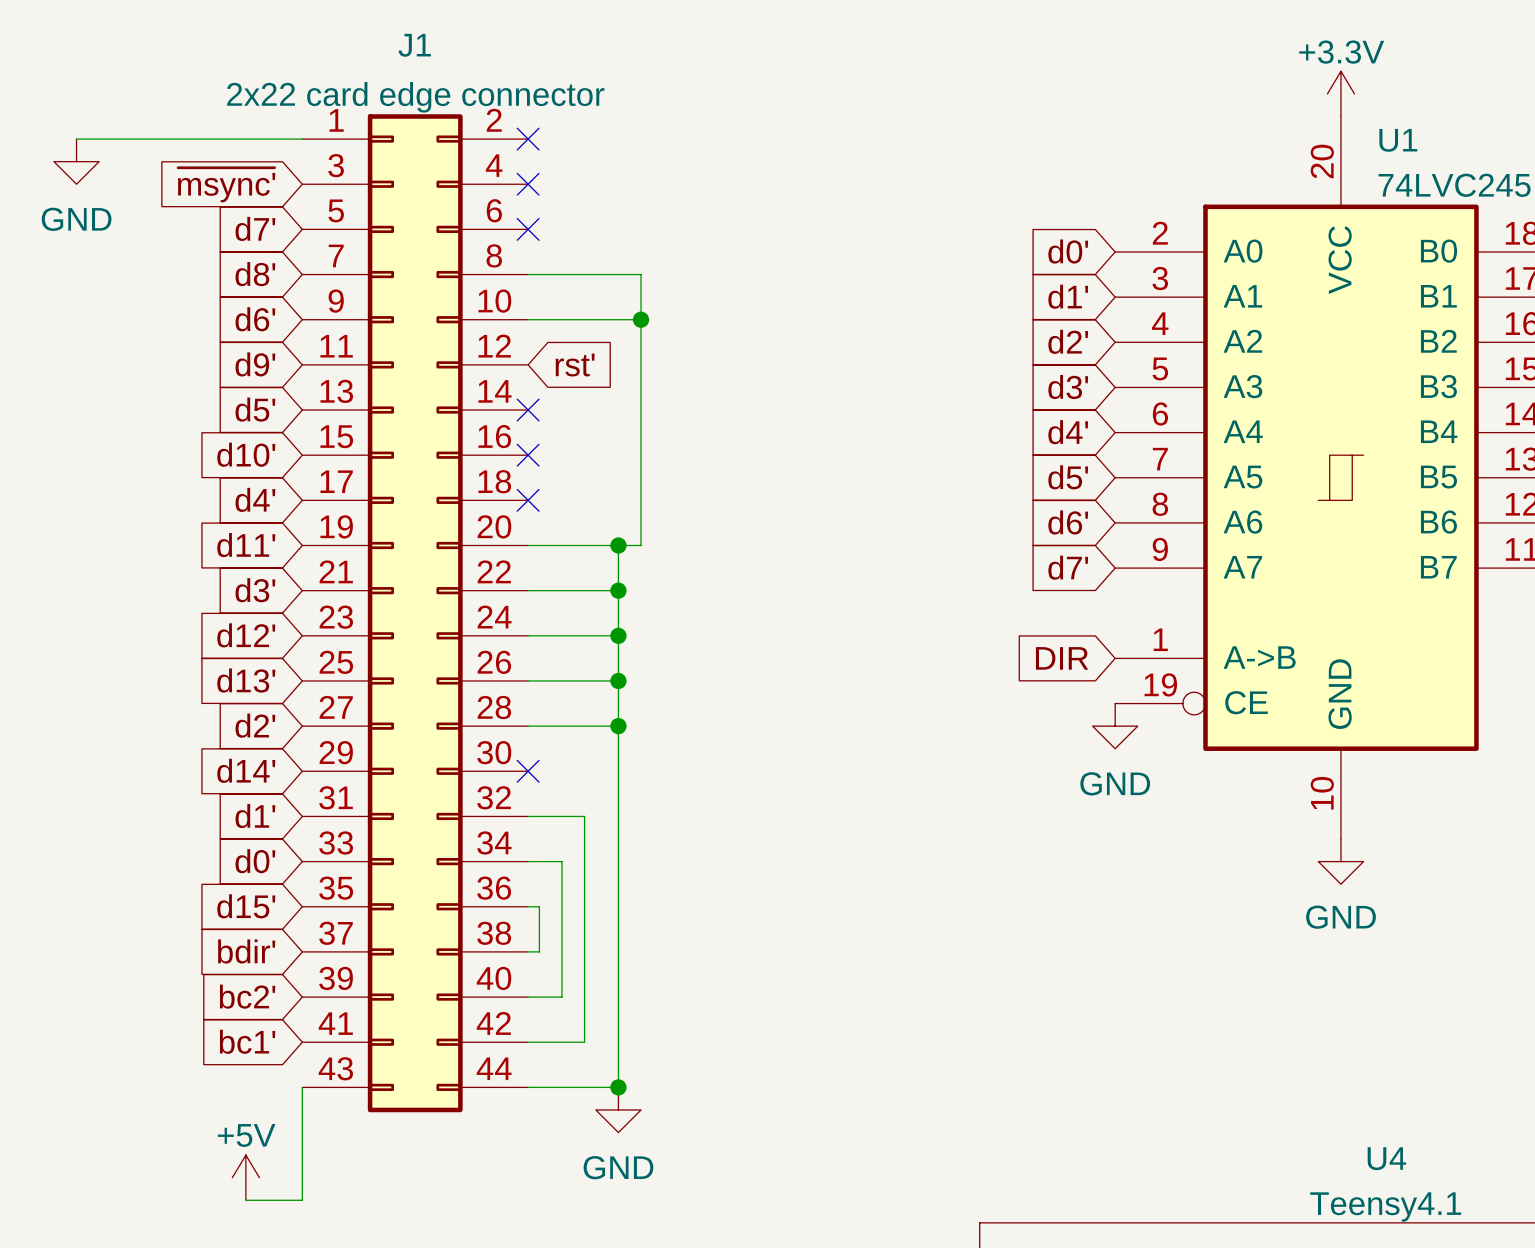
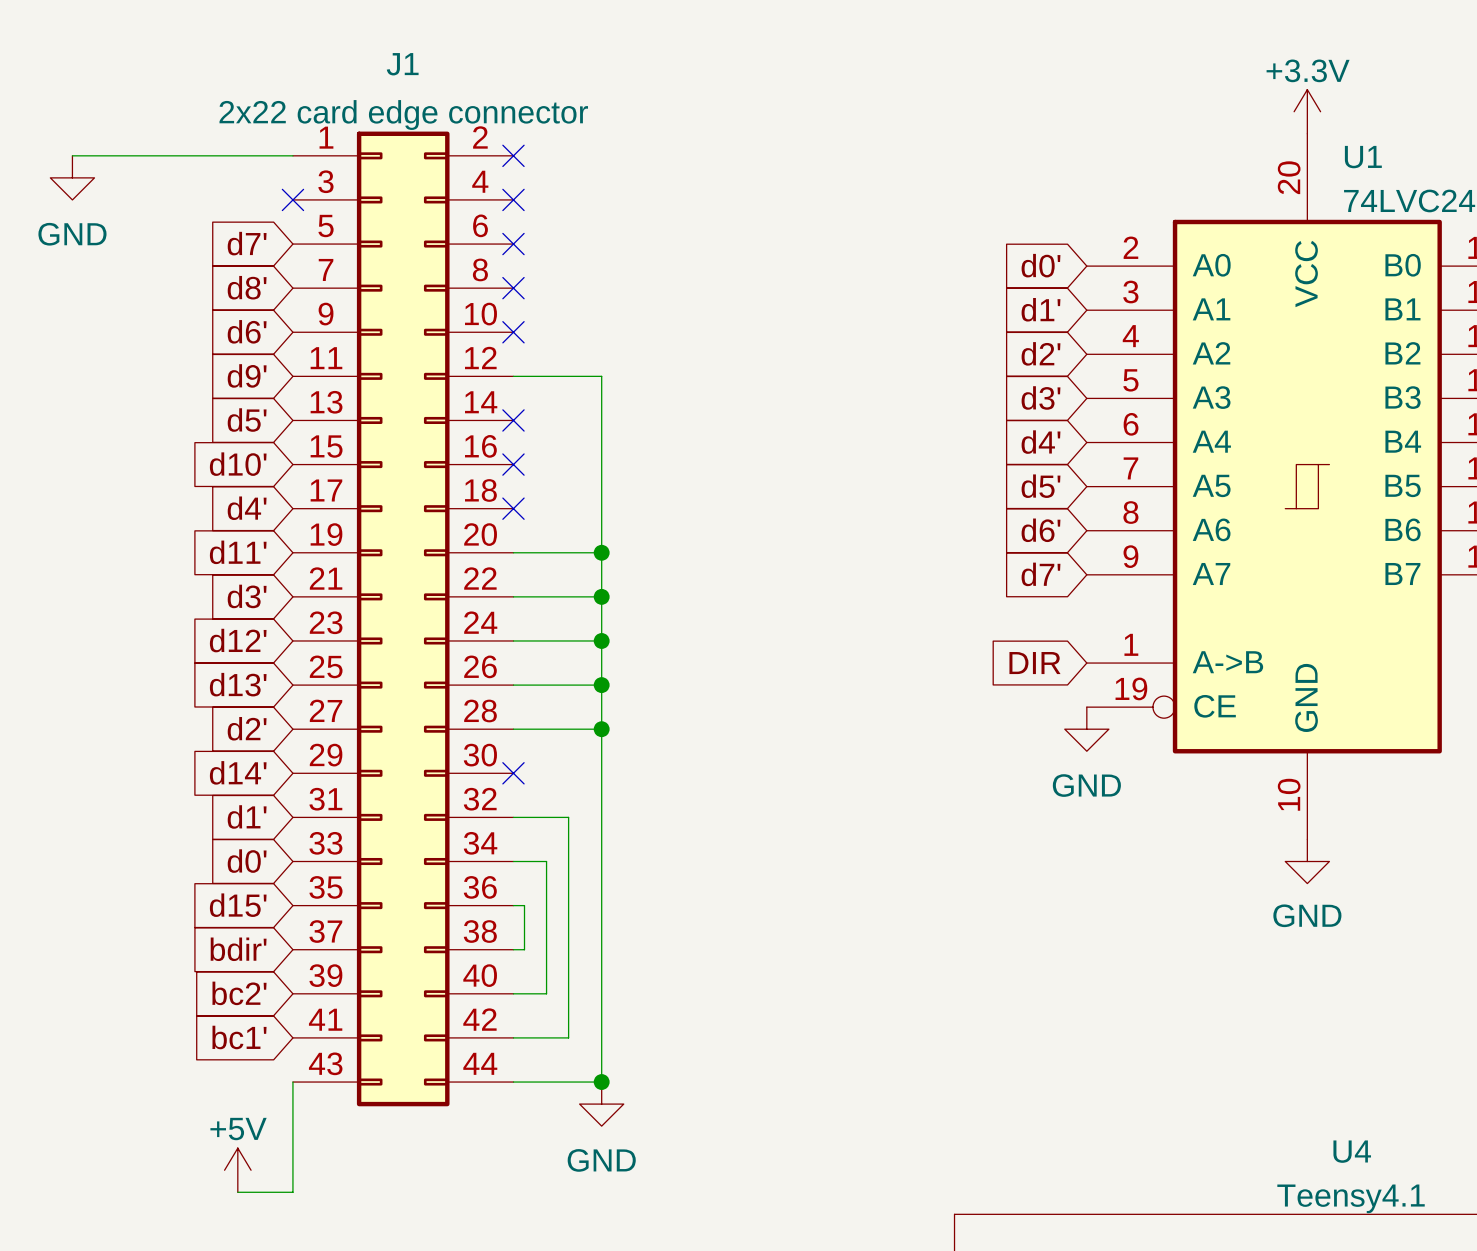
no-connect mark: none -> (292, 199)
global label: ~{msync'} (226, 185) -> none
wire: (528, 274) (641, 274) (641, 545) (618, 545) -> (513, 376) (601, 376) (601, 552)
no-connect mark: none -> (513, 288)
wire: (528, 319) (641, 319) -> none
no-connect mark: none -> (513, 332)
junction: (641, 319) -> none
global label: rst' (575, 365) -> none

